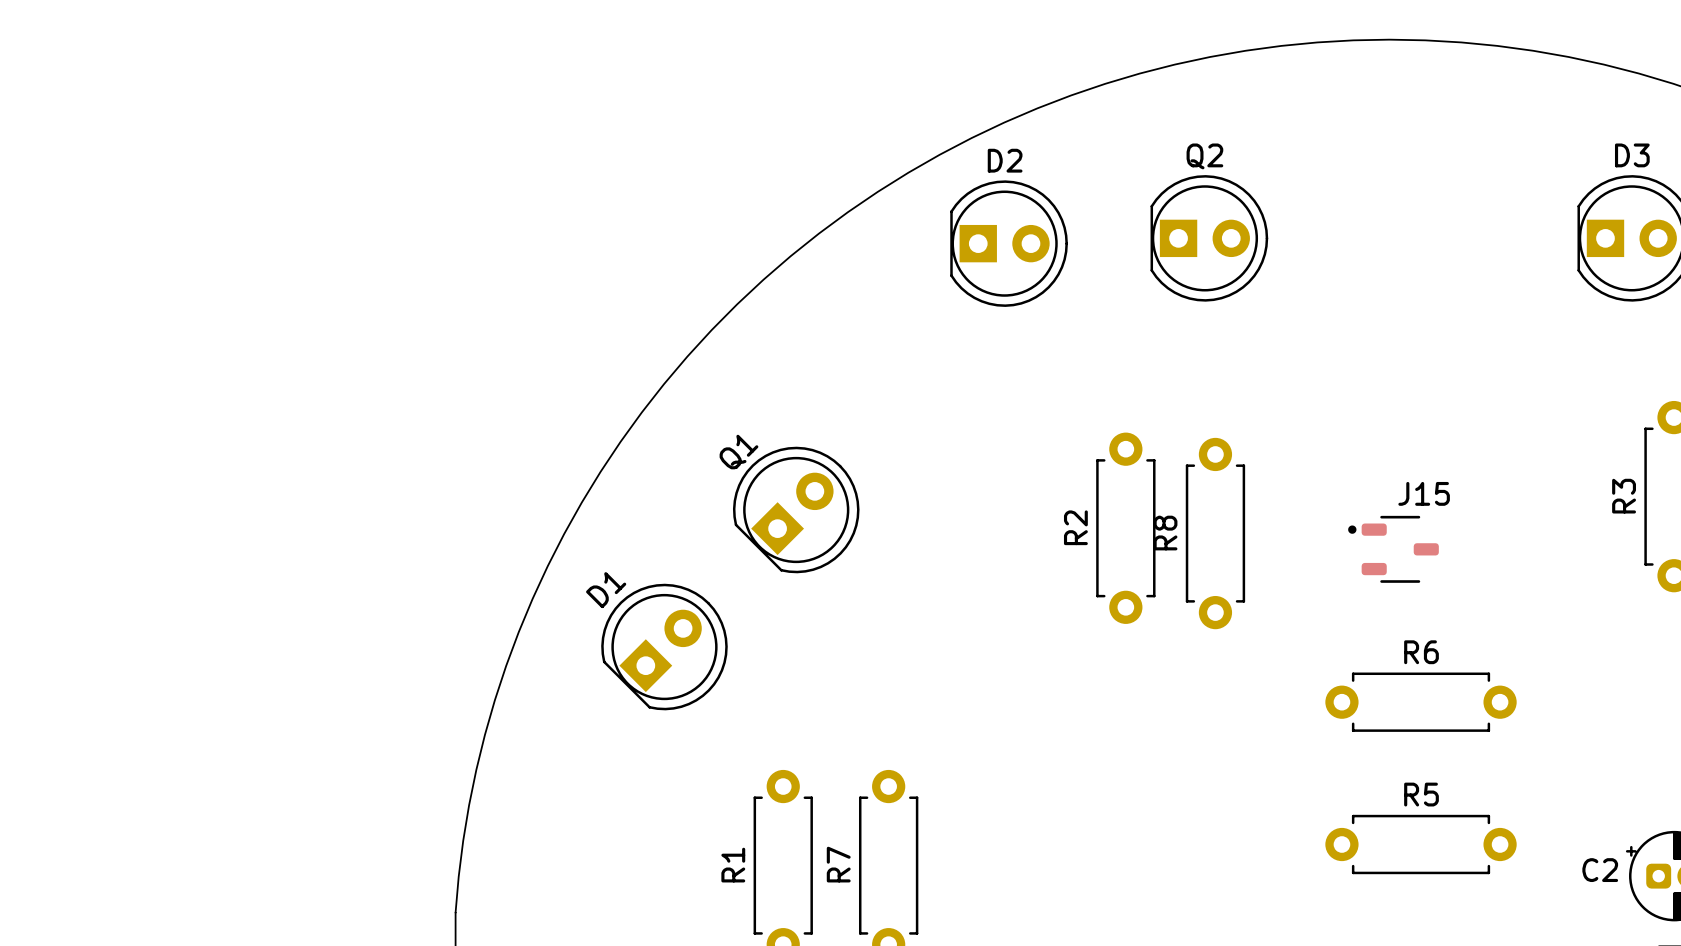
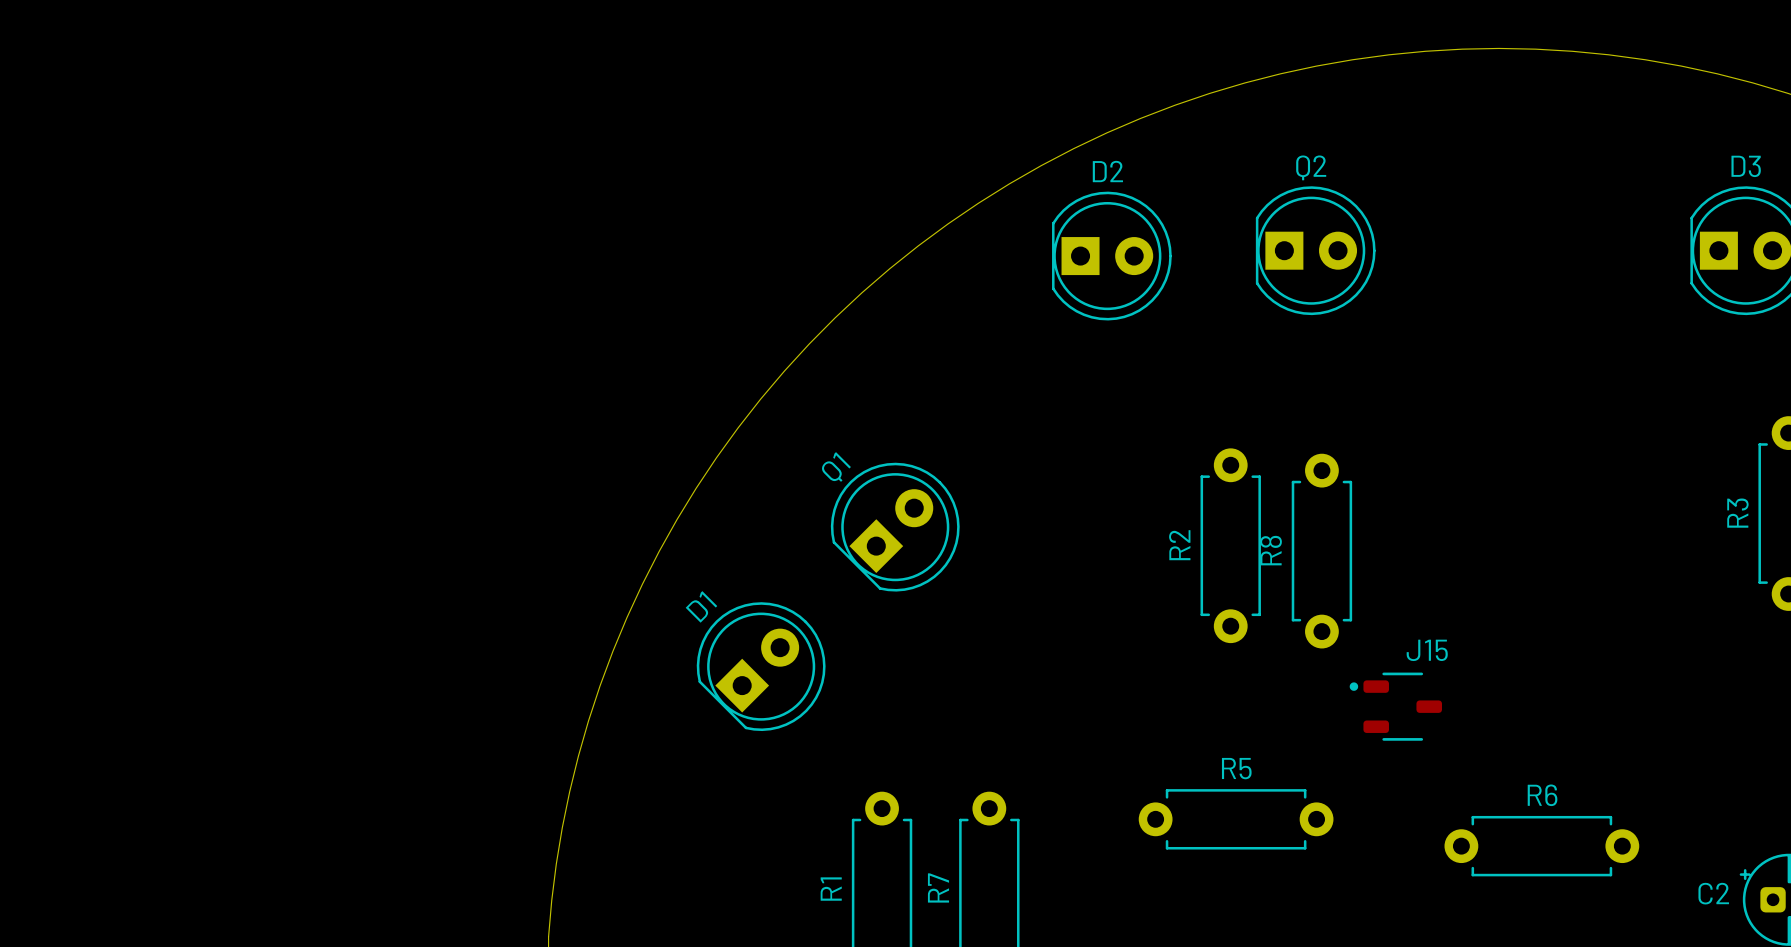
J15 position: (1393, 549) -> (1395, 706)
R6 position: (1421, 702) -> (1541, 846)
R5 position: (1421, 844) -> (1236, 819)

